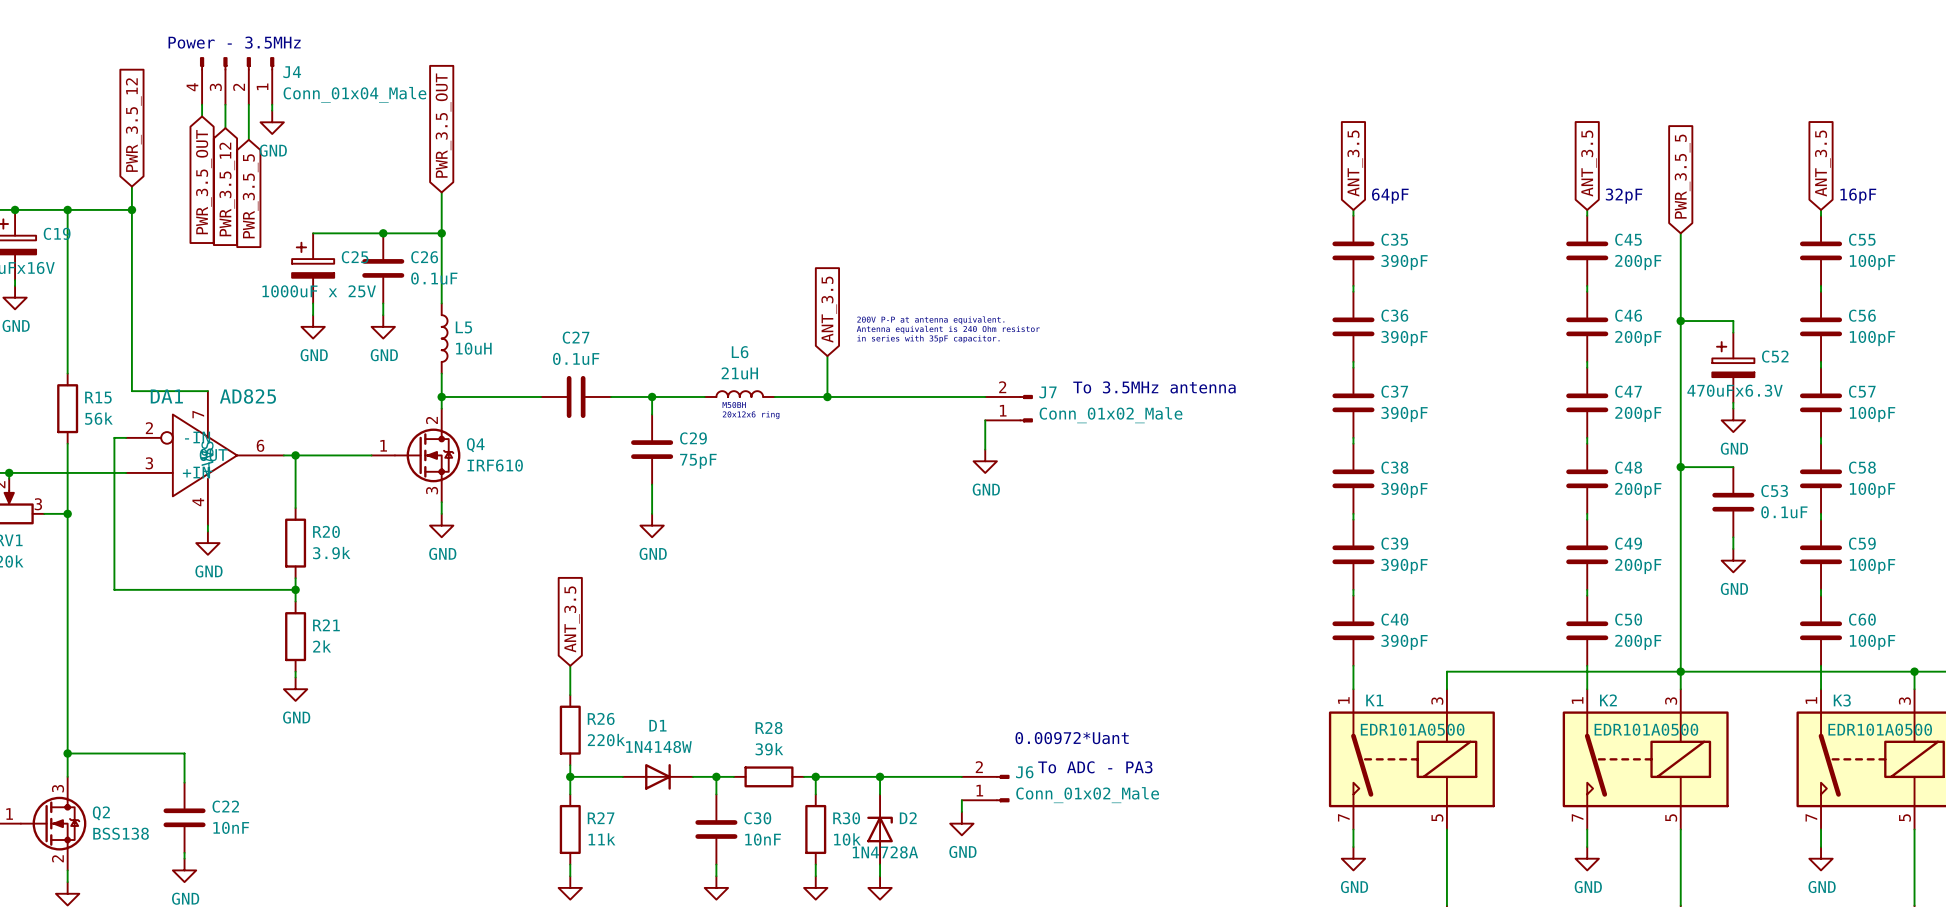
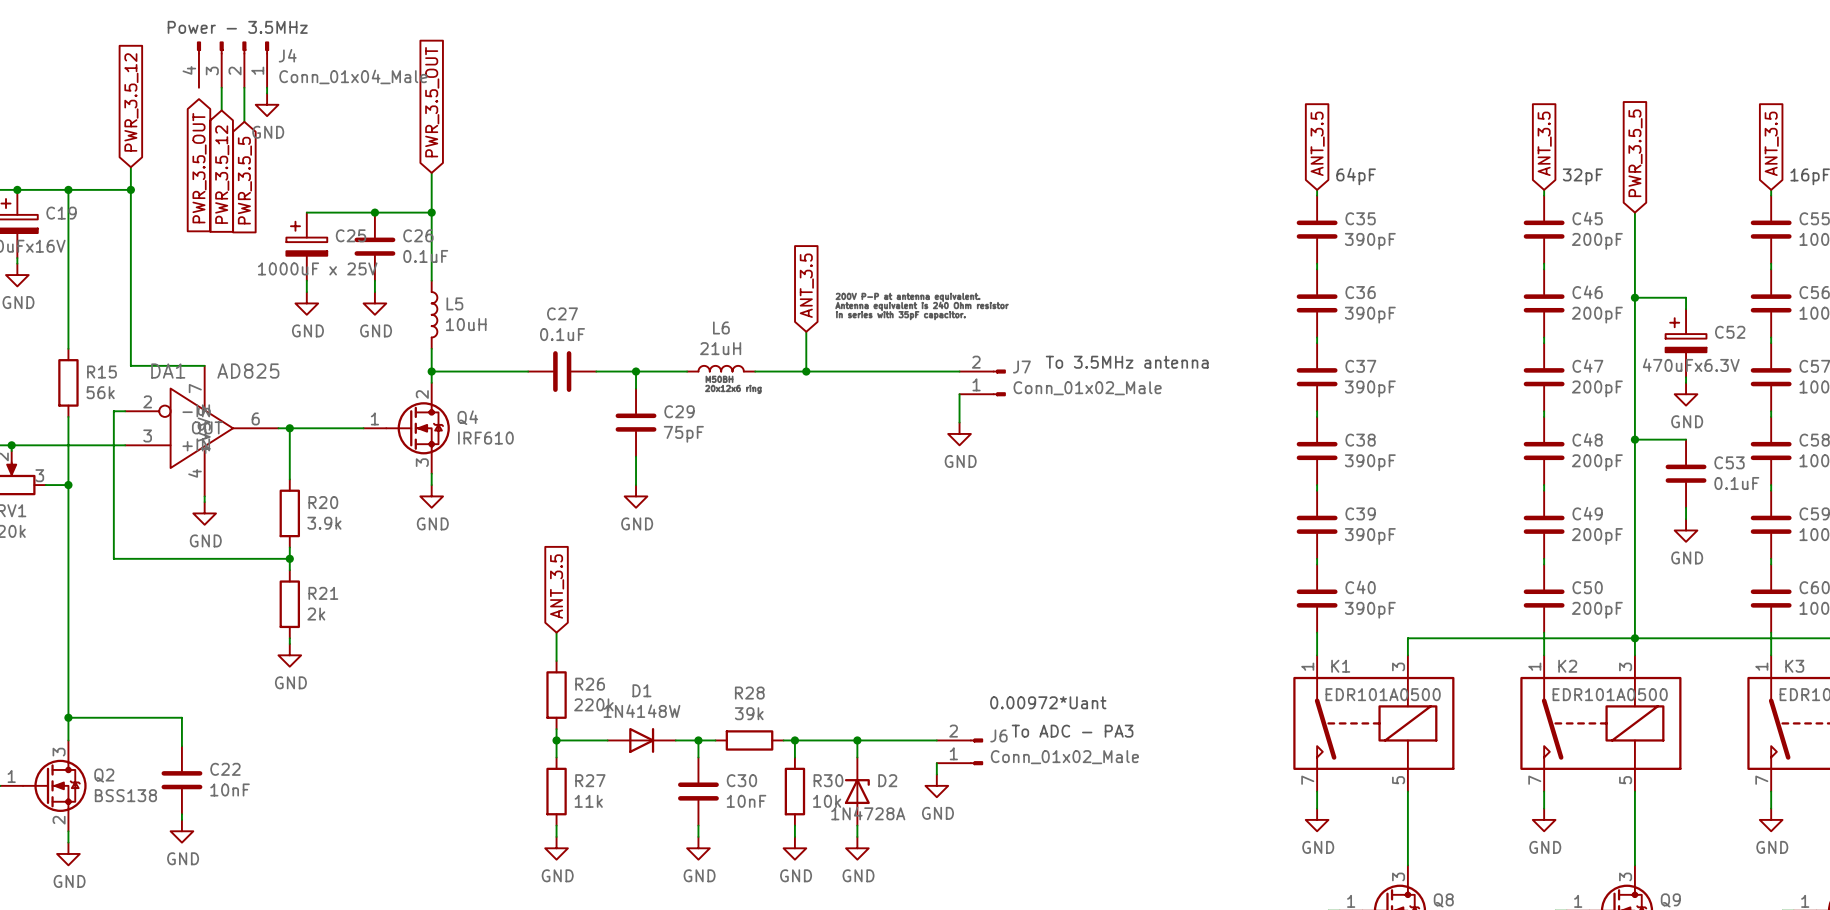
wire: (202, 104) (202, 116) -> none

